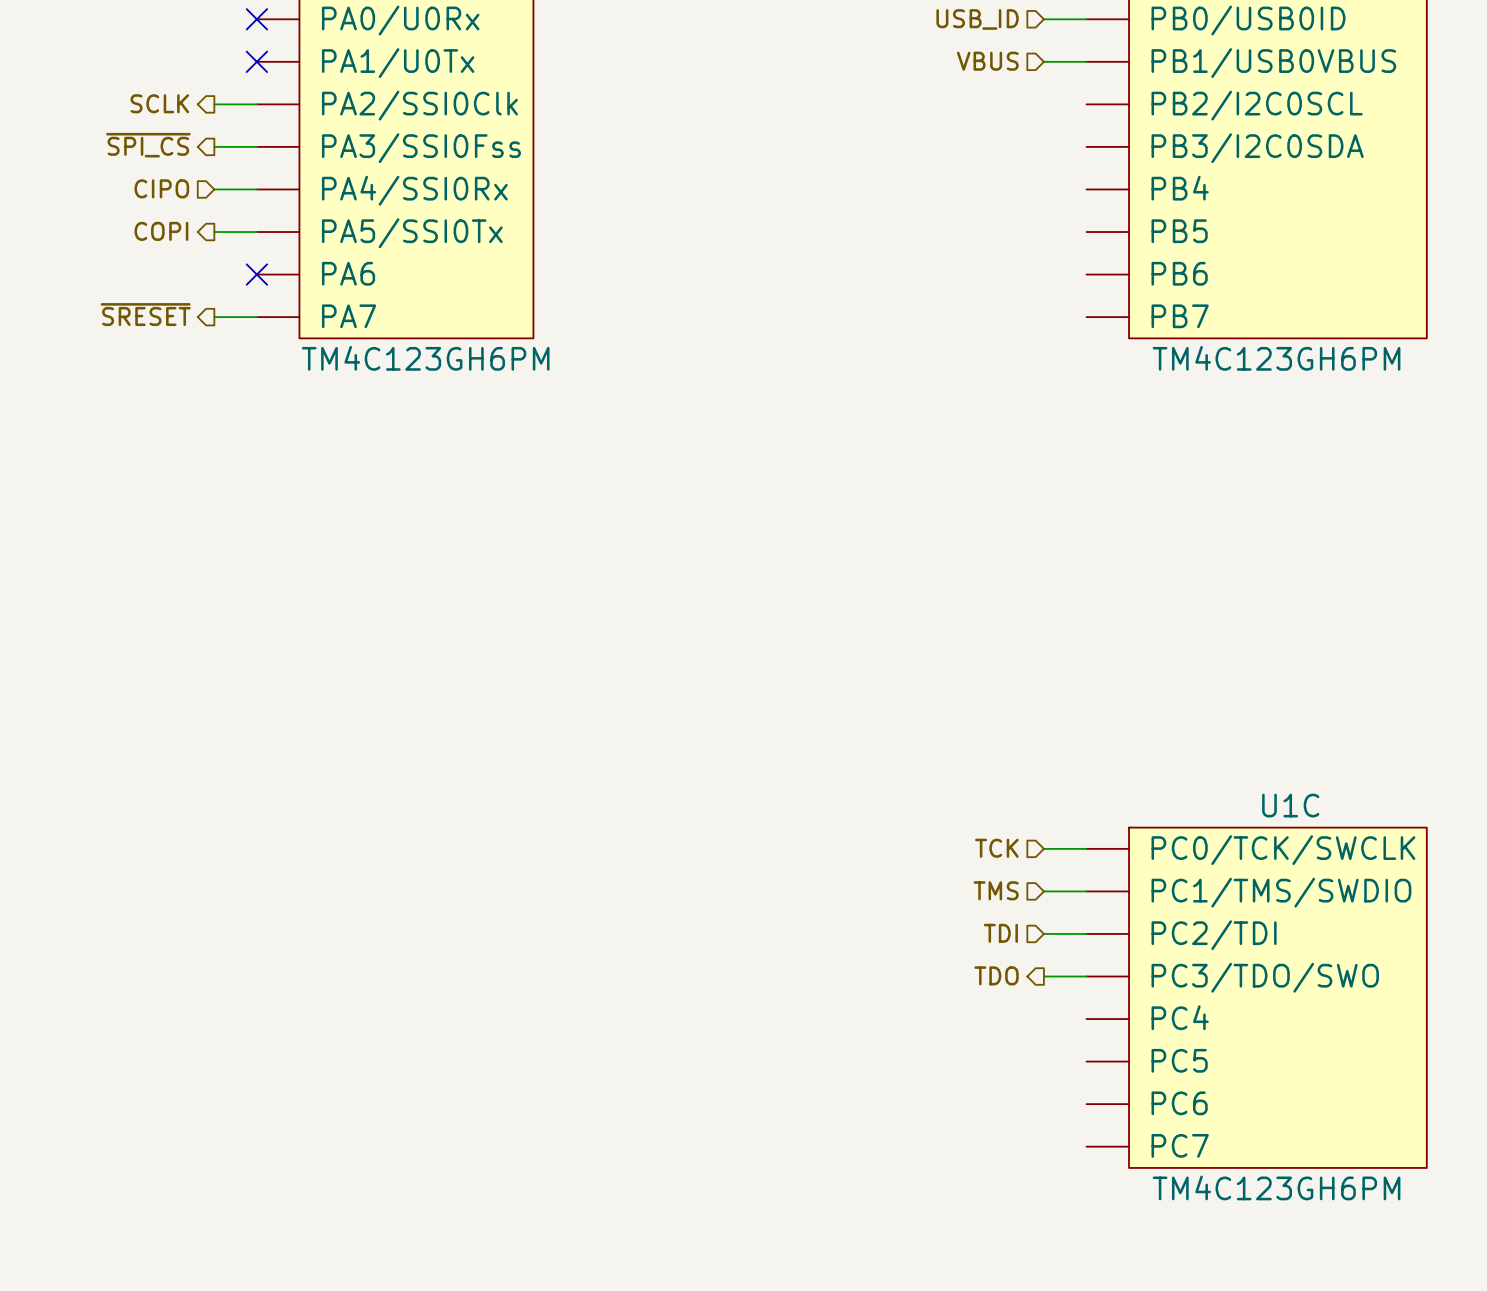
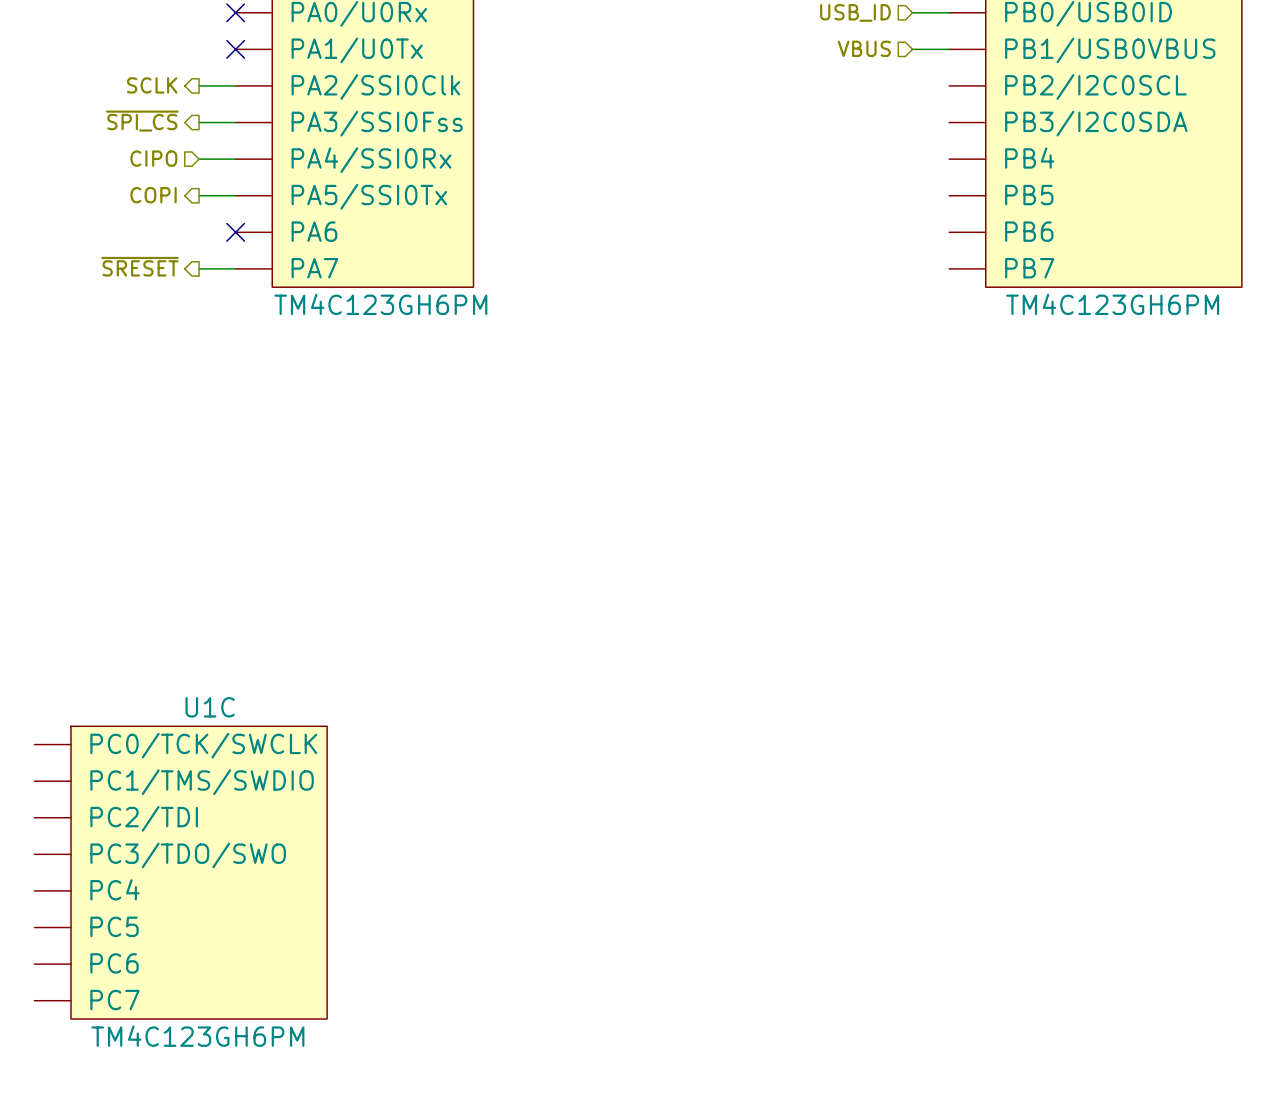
hierarchical label: TCK (996, 848) -> none
wire: (1043, 848) (1086, 848) -> none
hierarchical label: TMS (996, 890) -> none
wire: (1043, 891) (1086, 891) -> none
hierarchical label: TDI (1000, 933) -> none
wire: (1043, 933) (1086, 933) -> none
hierarchical label: TDO (996, 975) -> none
wire: (1043, 976) (1086, 976) -> none
U1C position: (1256, 997) -> (180, 872)

